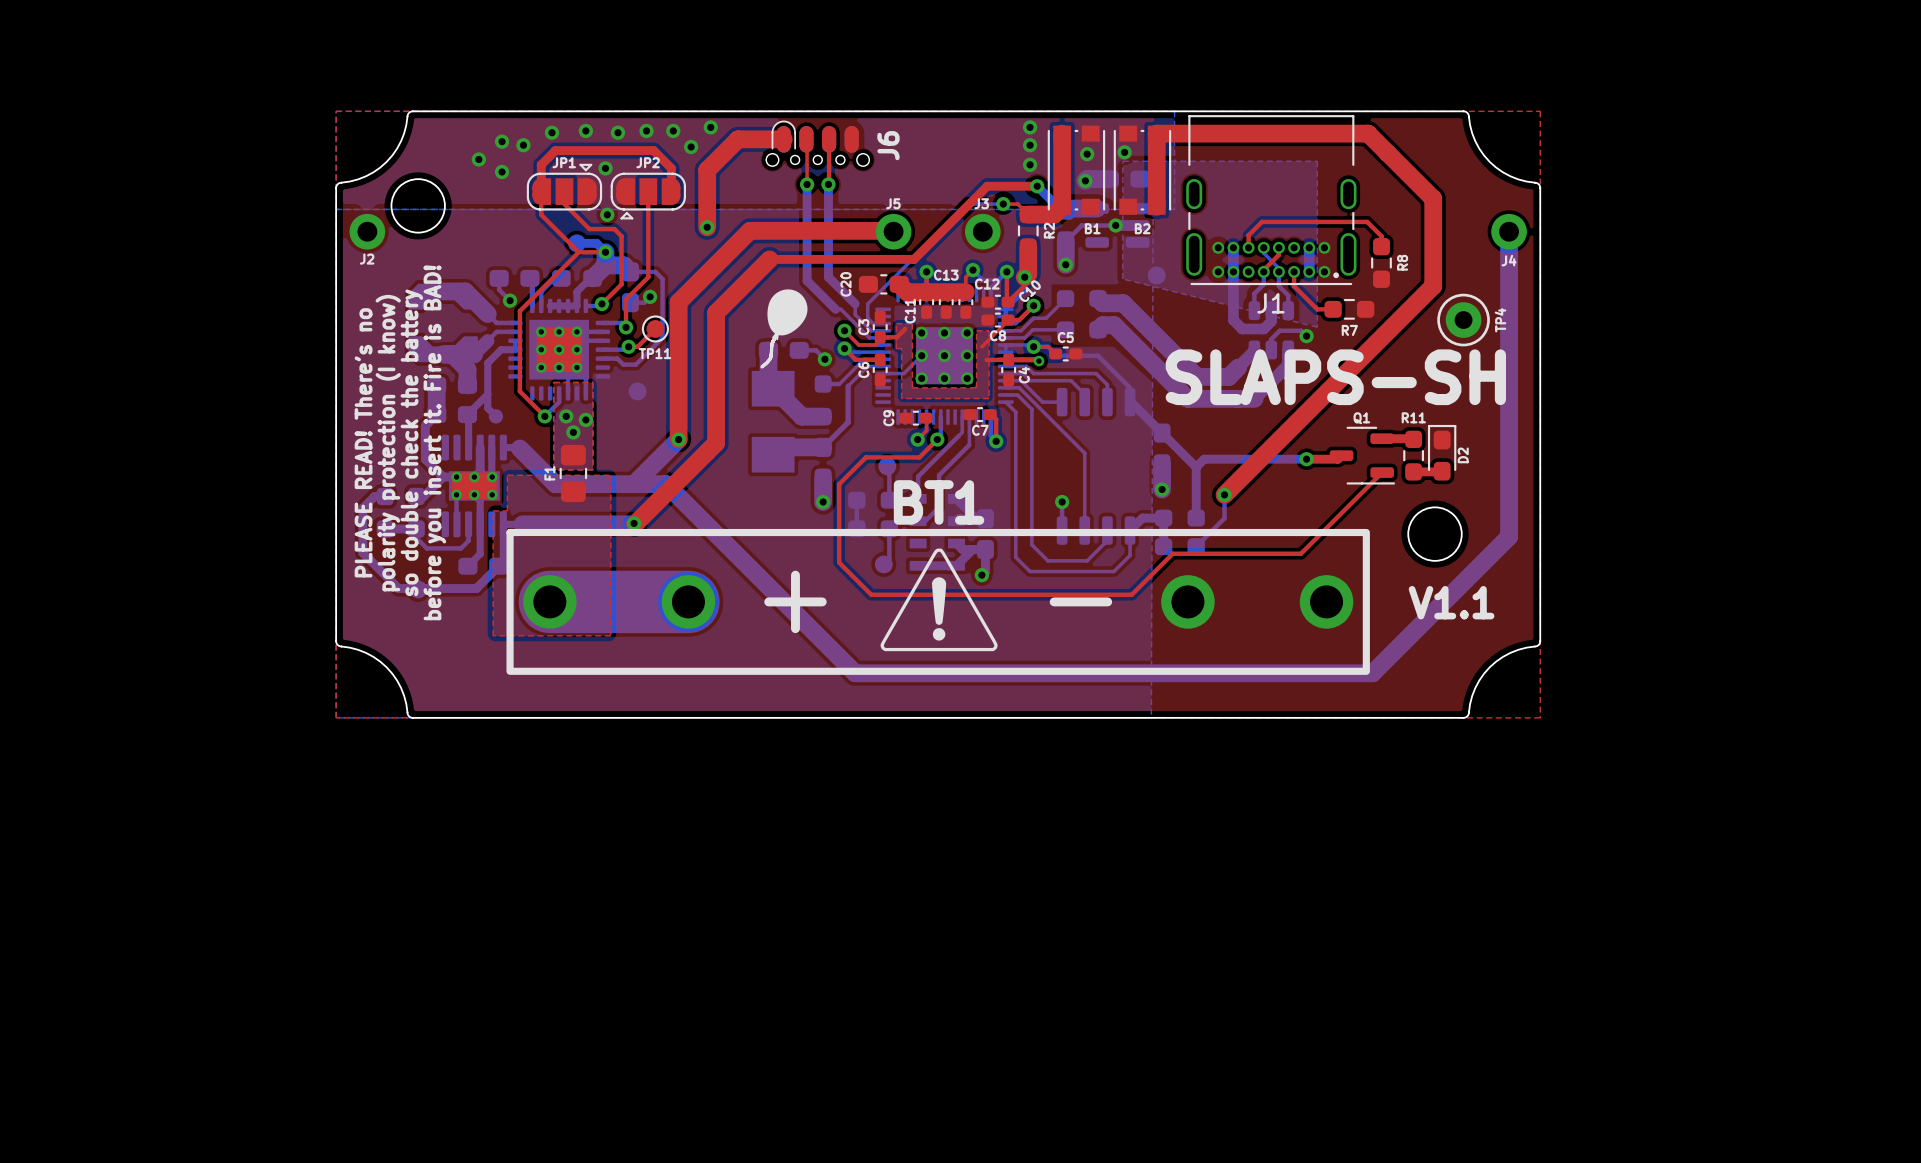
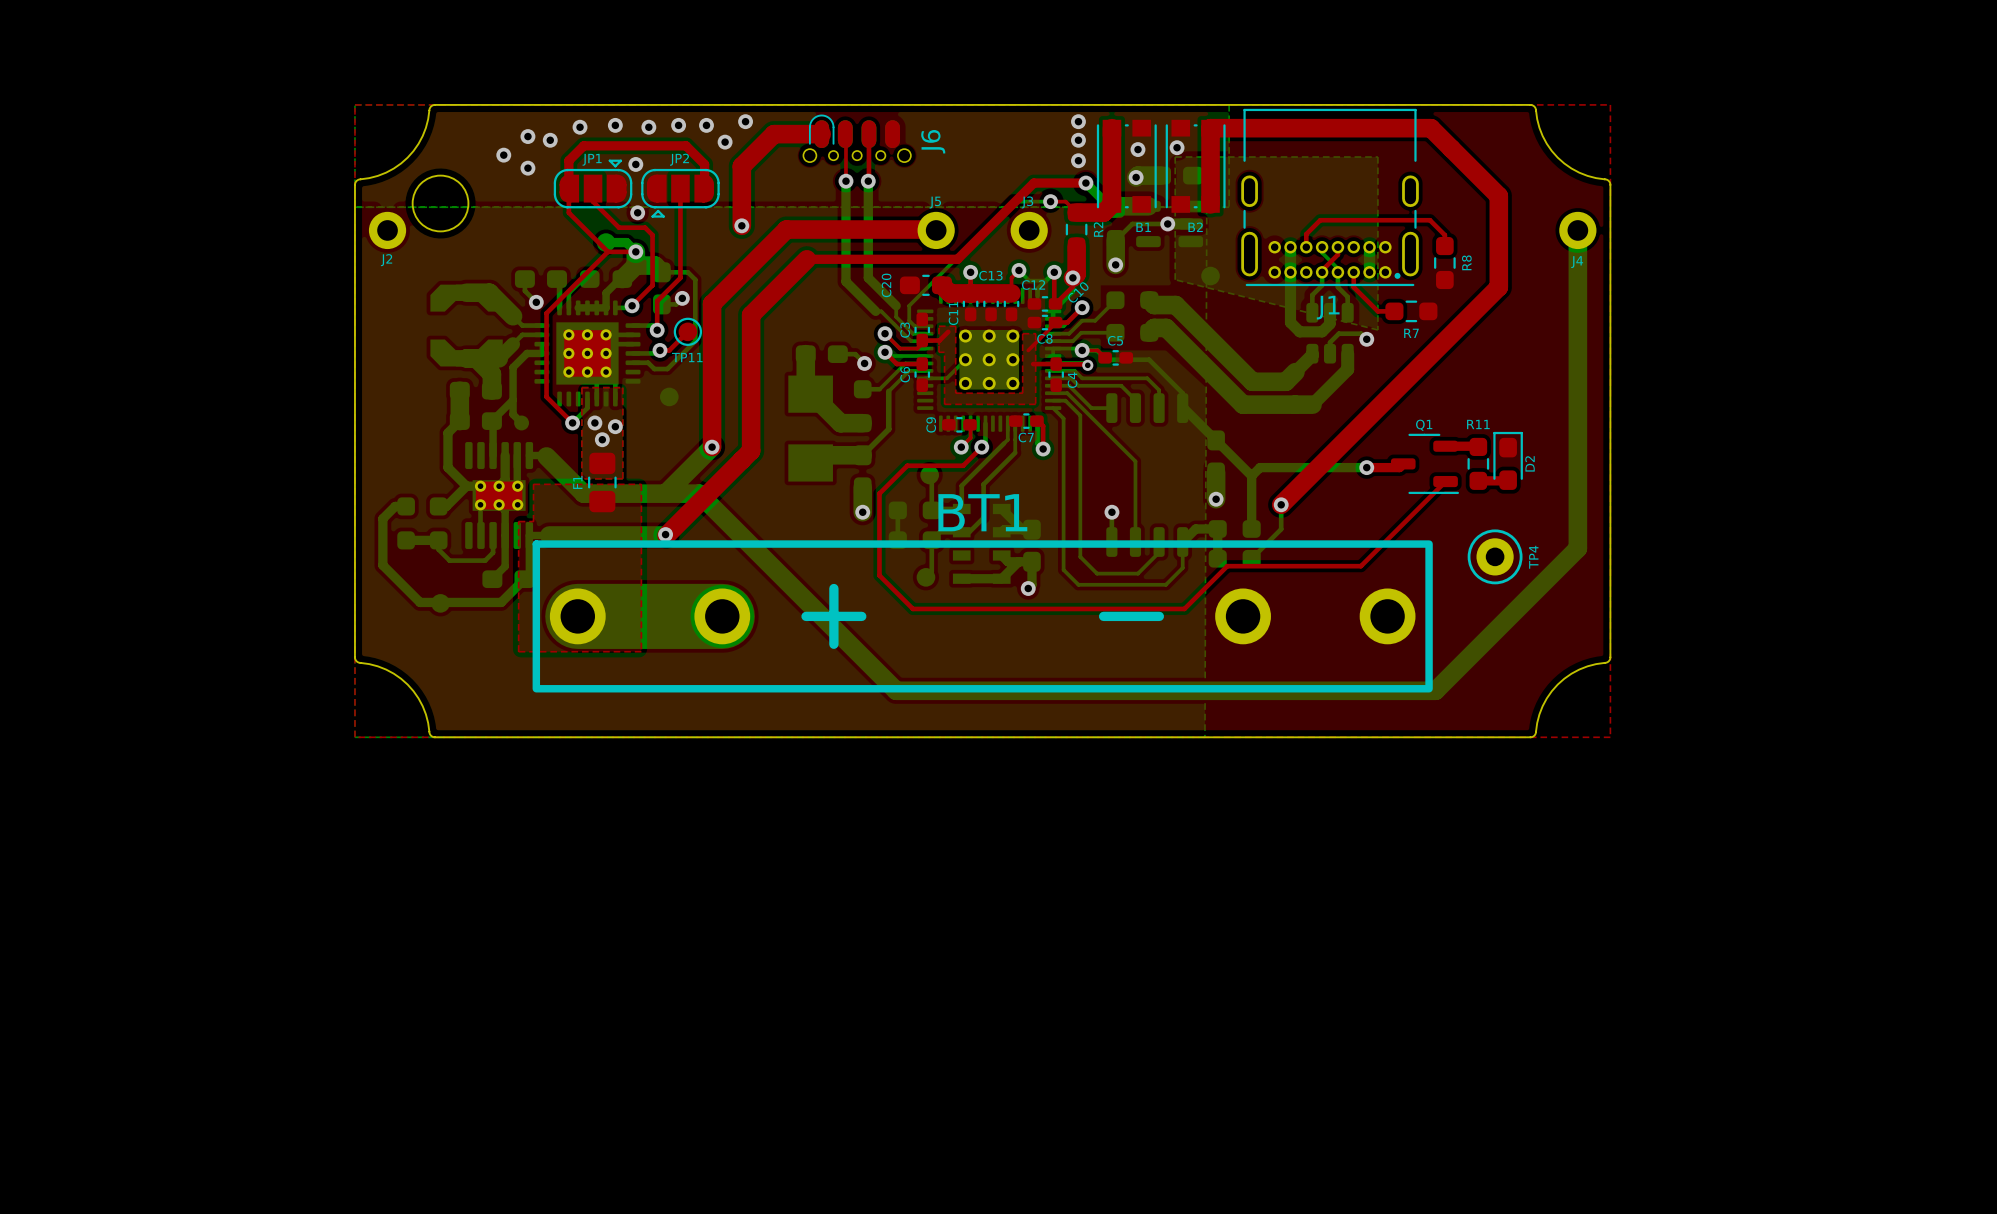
drawing: [760, 289, 808, 369] -> none
TP4 position: (1463, 320) -> (1495, 556)
text: SLAPS-SH (1335, 377) -> none
text: PLEASE READ! There's no (363, 442) -> none
text: so double check the battery (411, 442) -> none
text: before you insert it. Fire is BAD! (434, 442) -> none
text: polarity protection (I know) (388, 443) -> none
round board edge: [1407, 506, 1463, 562] -> none
drawing: [880, 548, 998, 652] -> none
text: V1.1 (1451, 602) -> none

